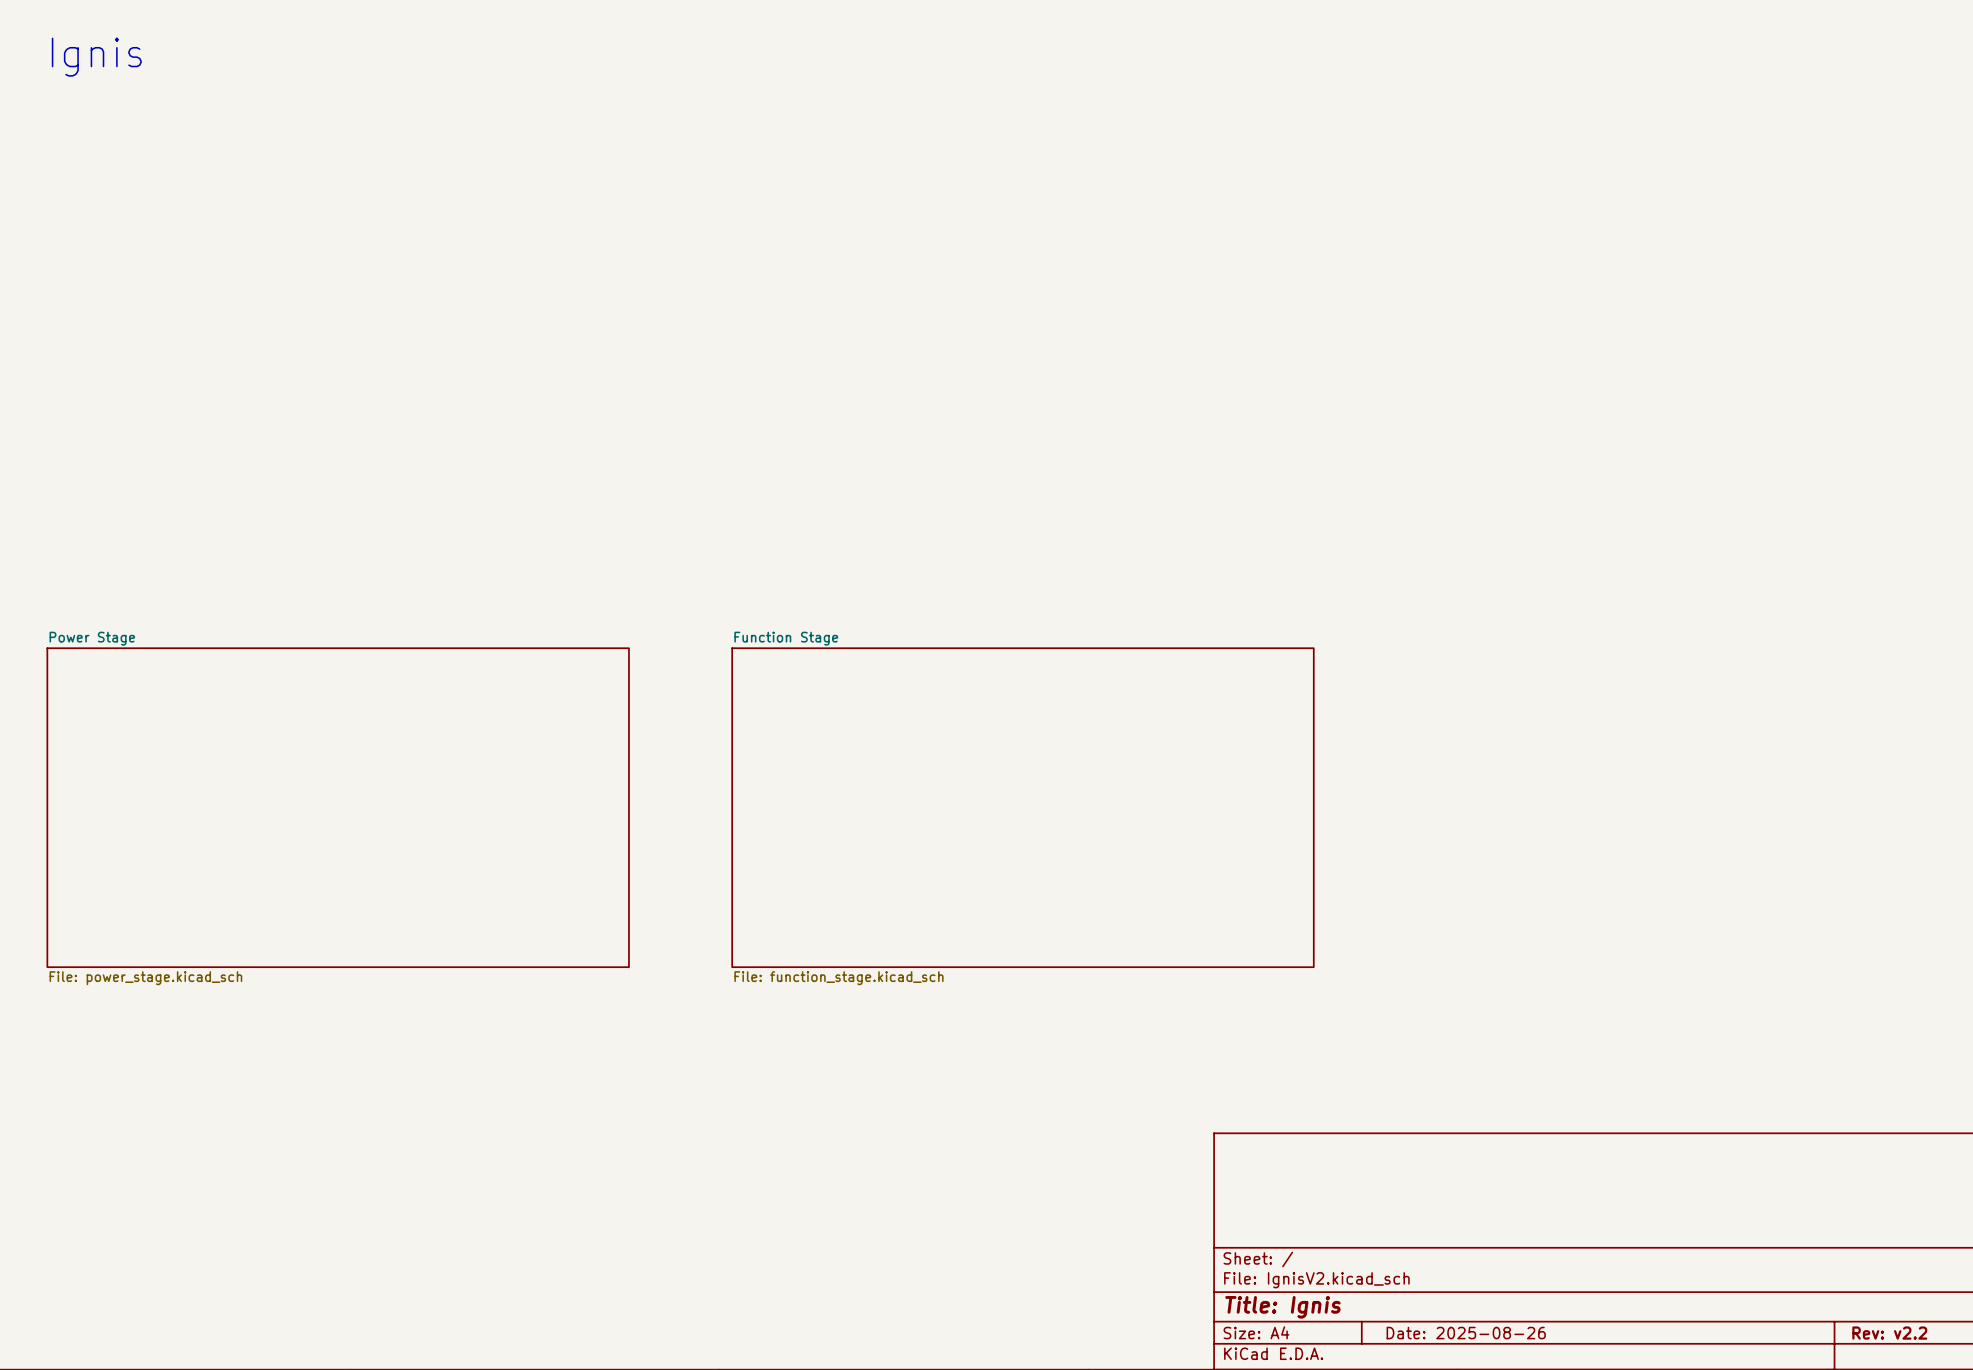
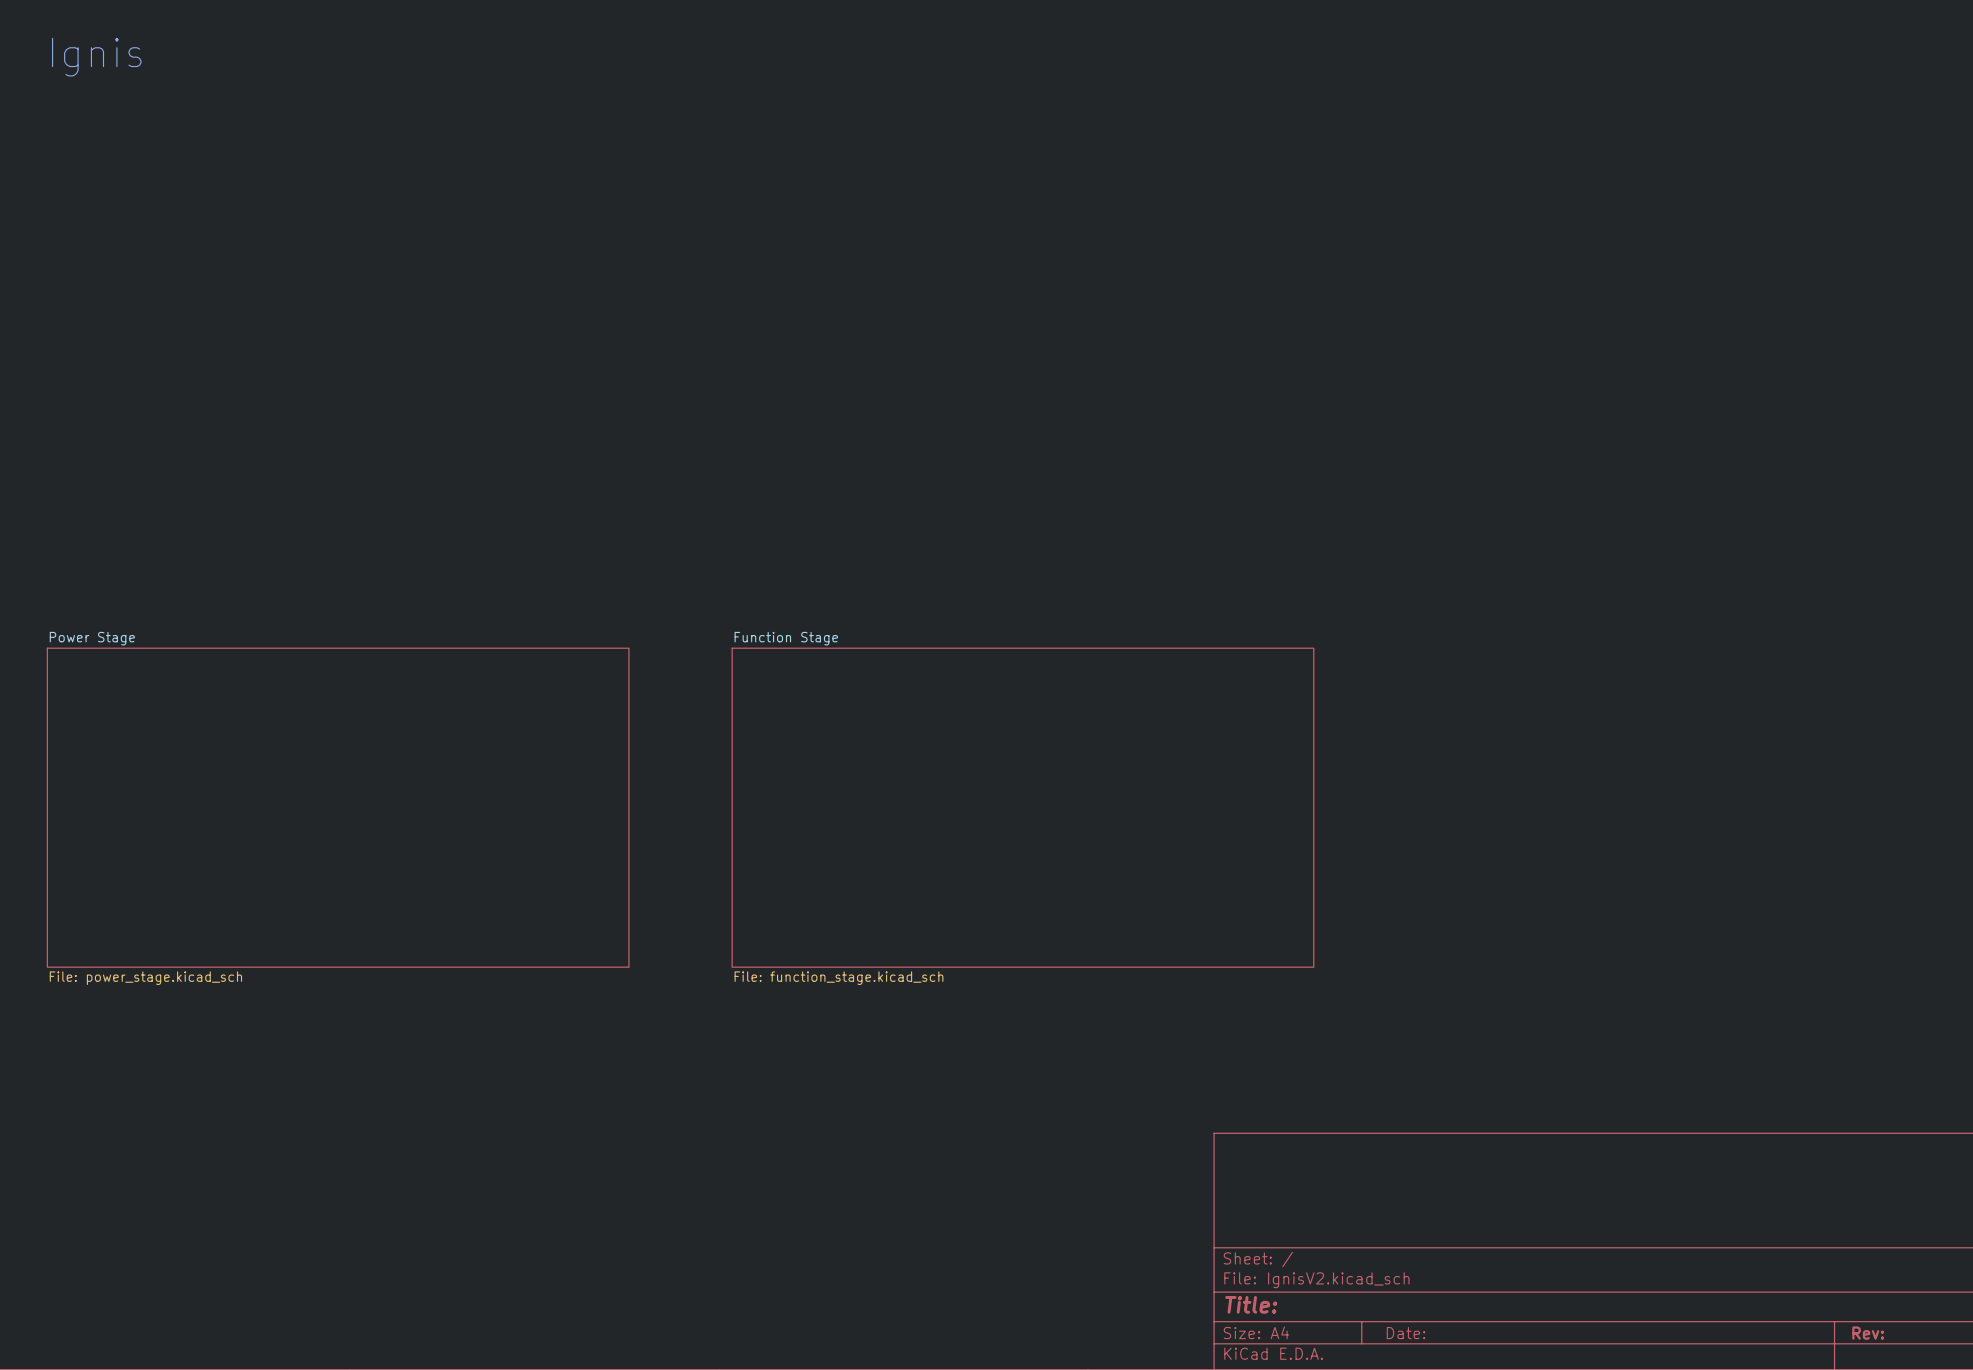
title block: Title: Ignis (1282, 1307) -> Title: (1251, 1304)
title block: Date: 2025-08-26 (1466, 1333) -> Date: (1406, 1333)
title block: Rev: v2.2 (1889, 1333) -> Rev: (1868, 1333)

